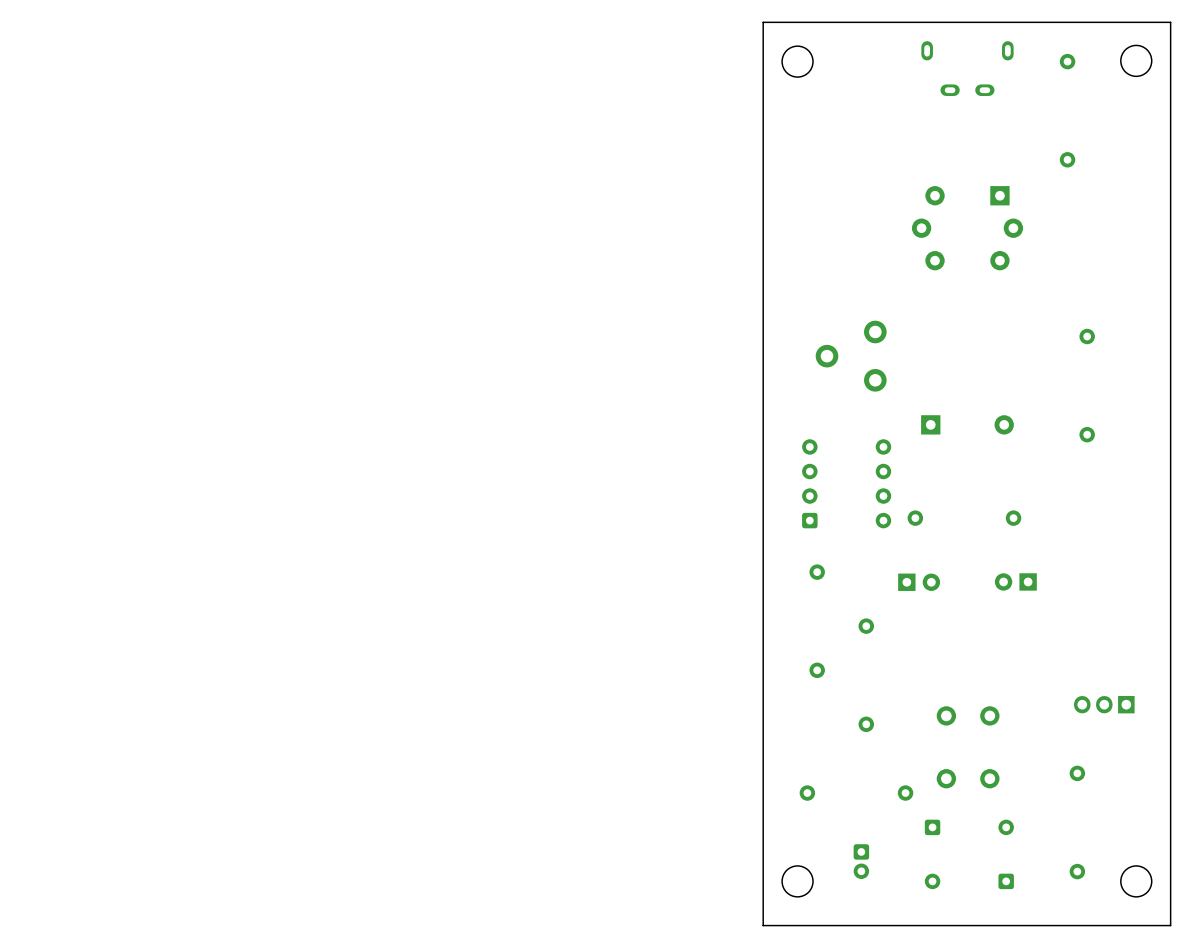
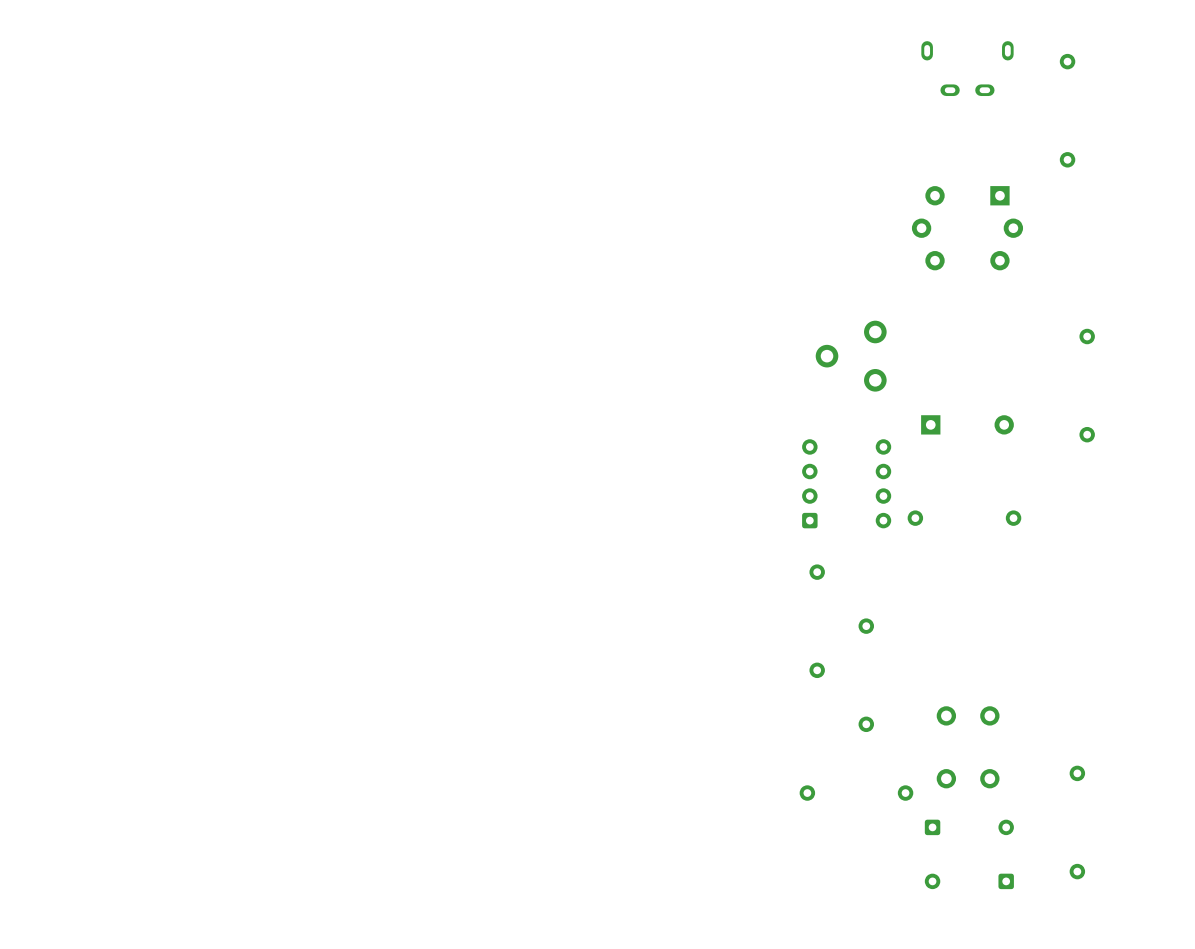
board edge: (1170, 22) (763, 22) (763, 925) (1170, 925) (1170, 22) -> none
round board edge: [781, 45, 814, 78] -> none
round board edge: [1120, 45, 1152, 77] -> none
part: (1015, 581) -> none
part: (919, 582) -> none
part: (1104, 704) -> none
part: (861, 861) -> none
round board edge: [781, 865, 814, 898] -> none
round board edge: [1120, 865, 1152, 898] -> none

